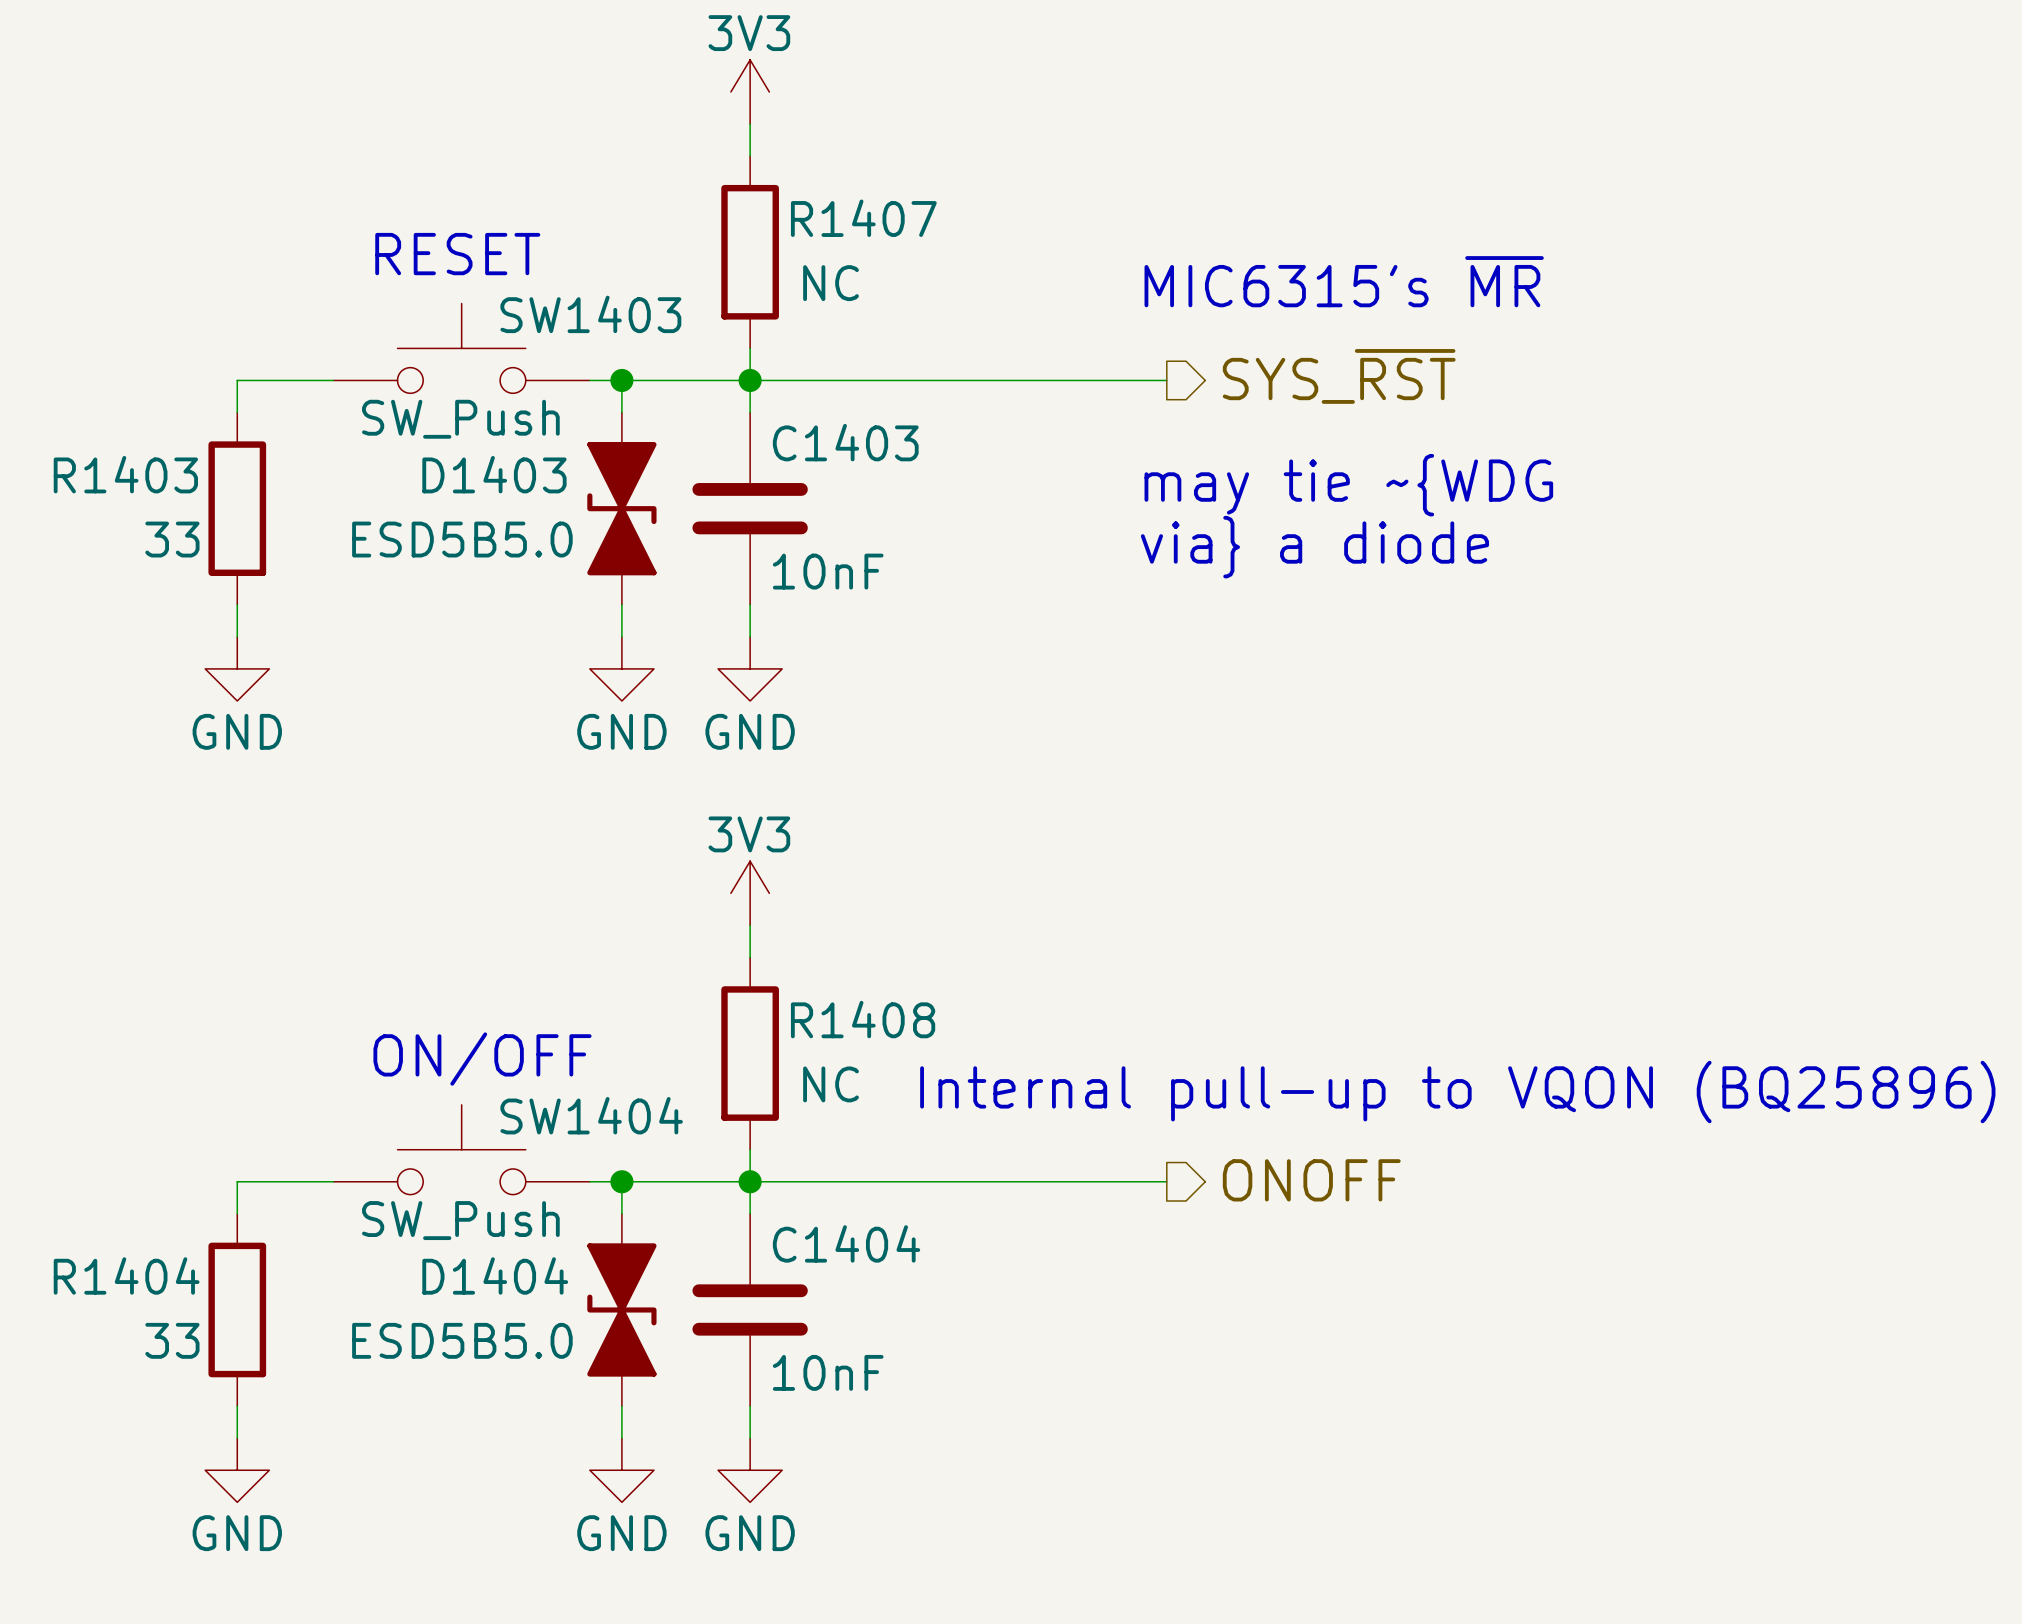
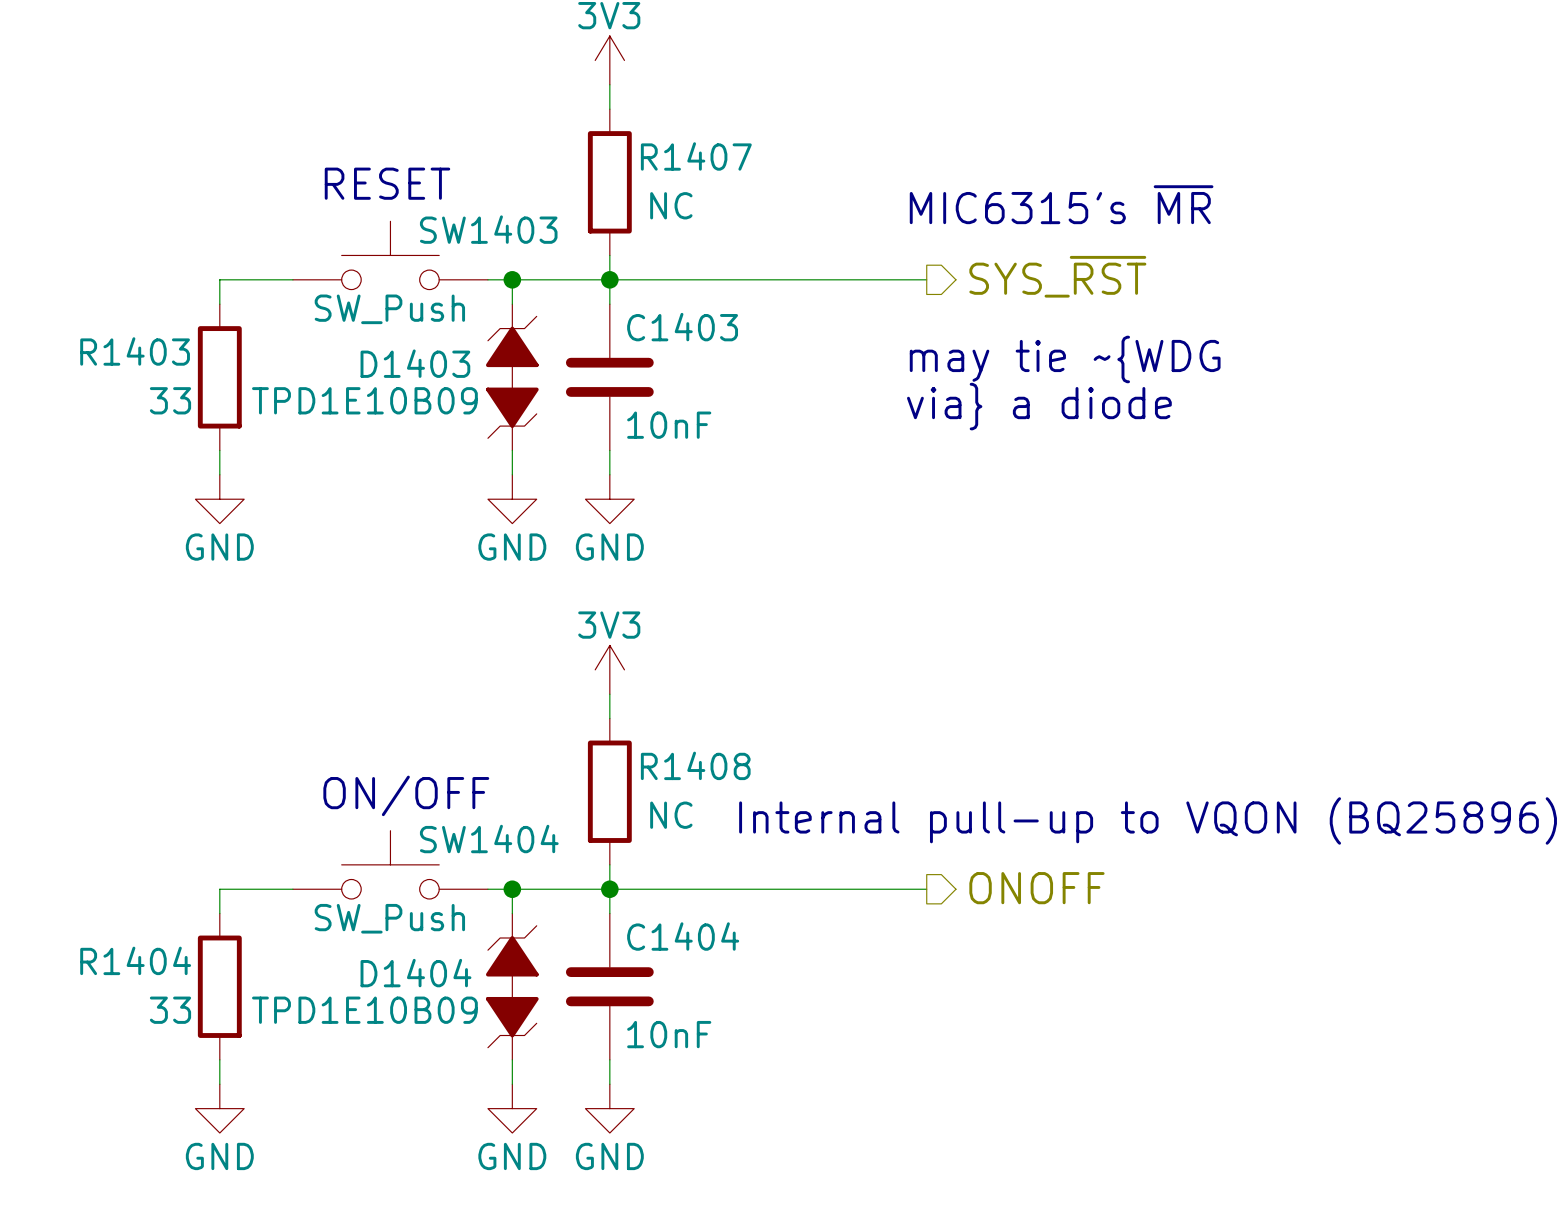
D1403 symbol: [587, 412, 657, 605] -> [486, 304, 539, 451]
D1403 value: ESD5B5.0 (462, 539) -> TPD1E10B09 (364, 400)
D1404 symbol: [587, 1213, 657, 1407] -> [486, 913, 539, 1060]
D1404 value: ESD5B5.0 (462, 1340) -> TPD1E10B09 (364, 1010)

